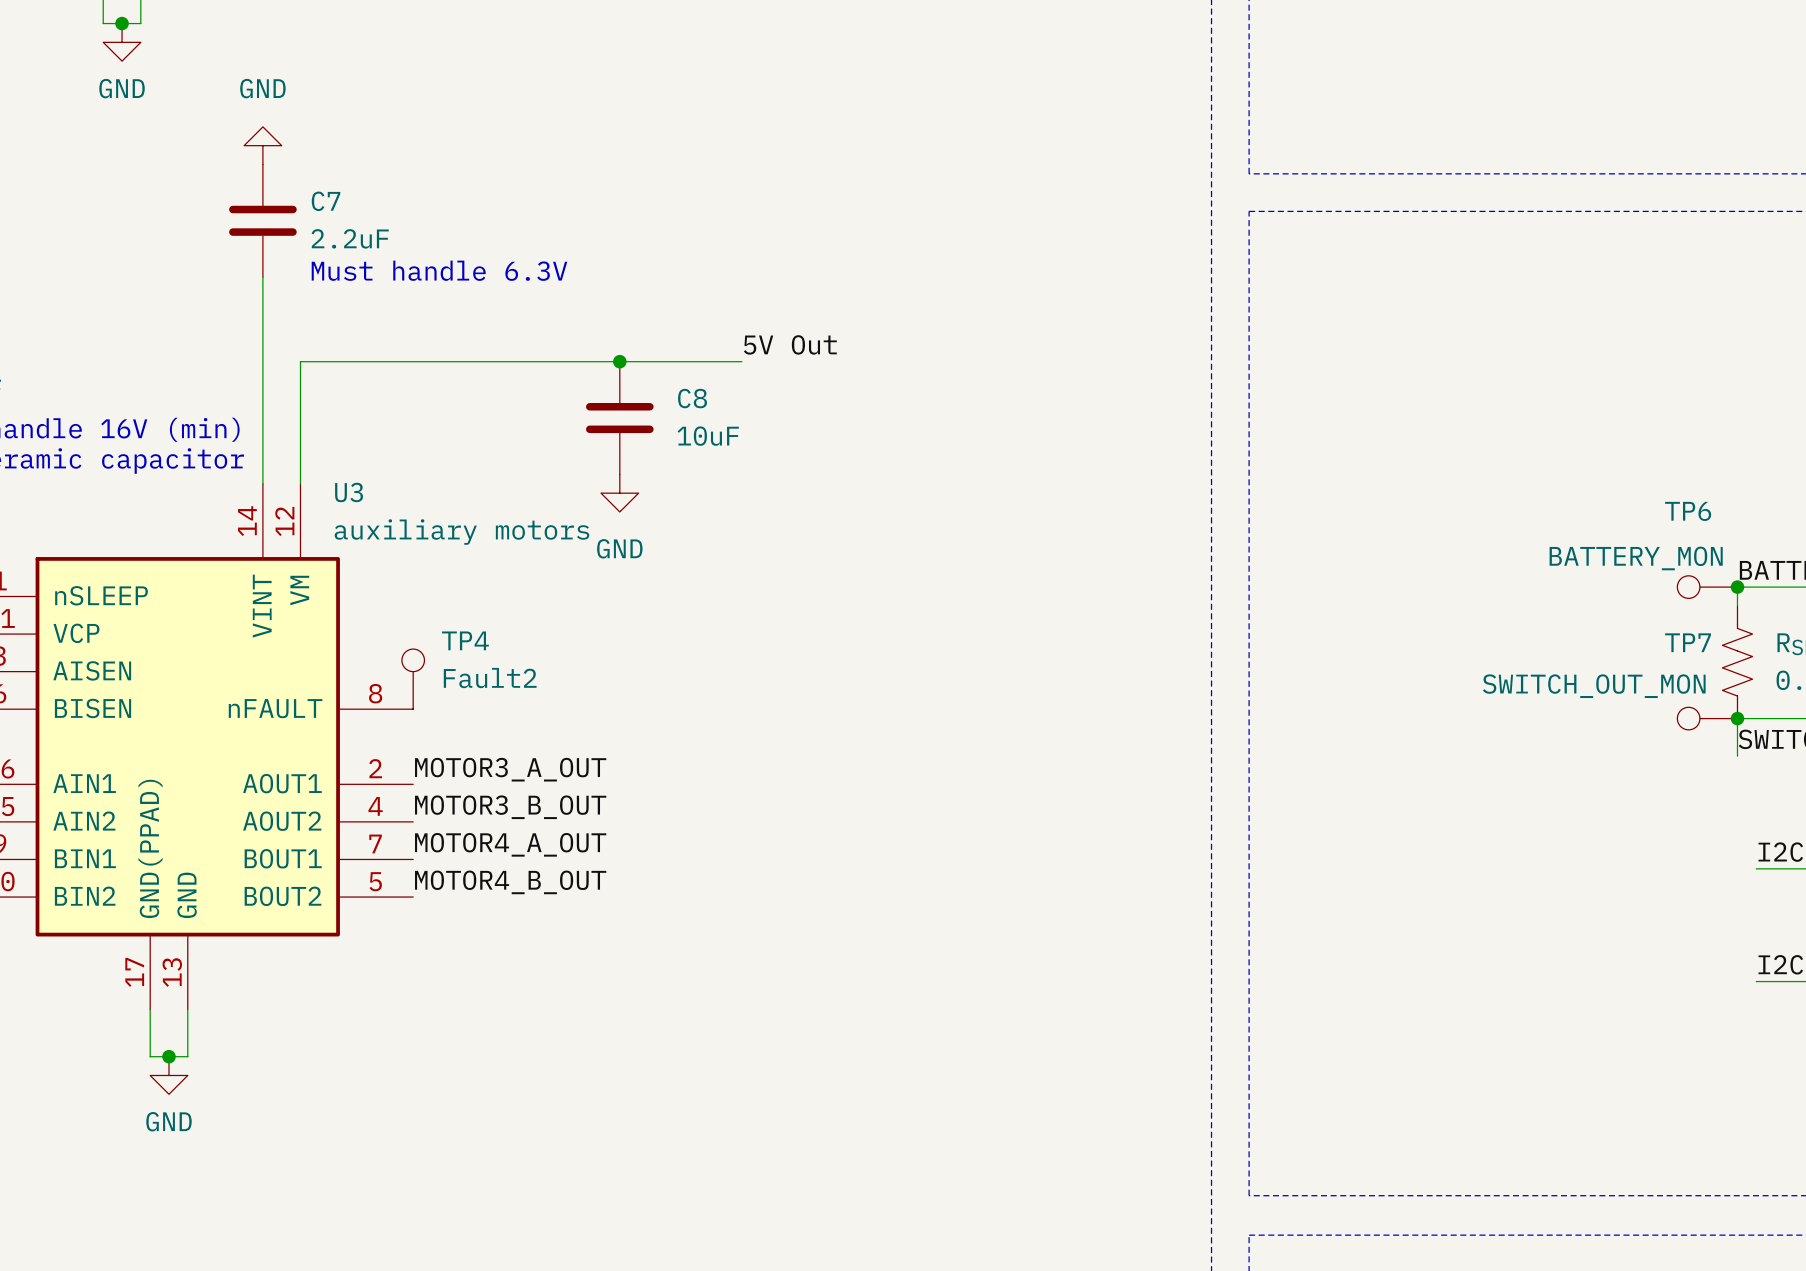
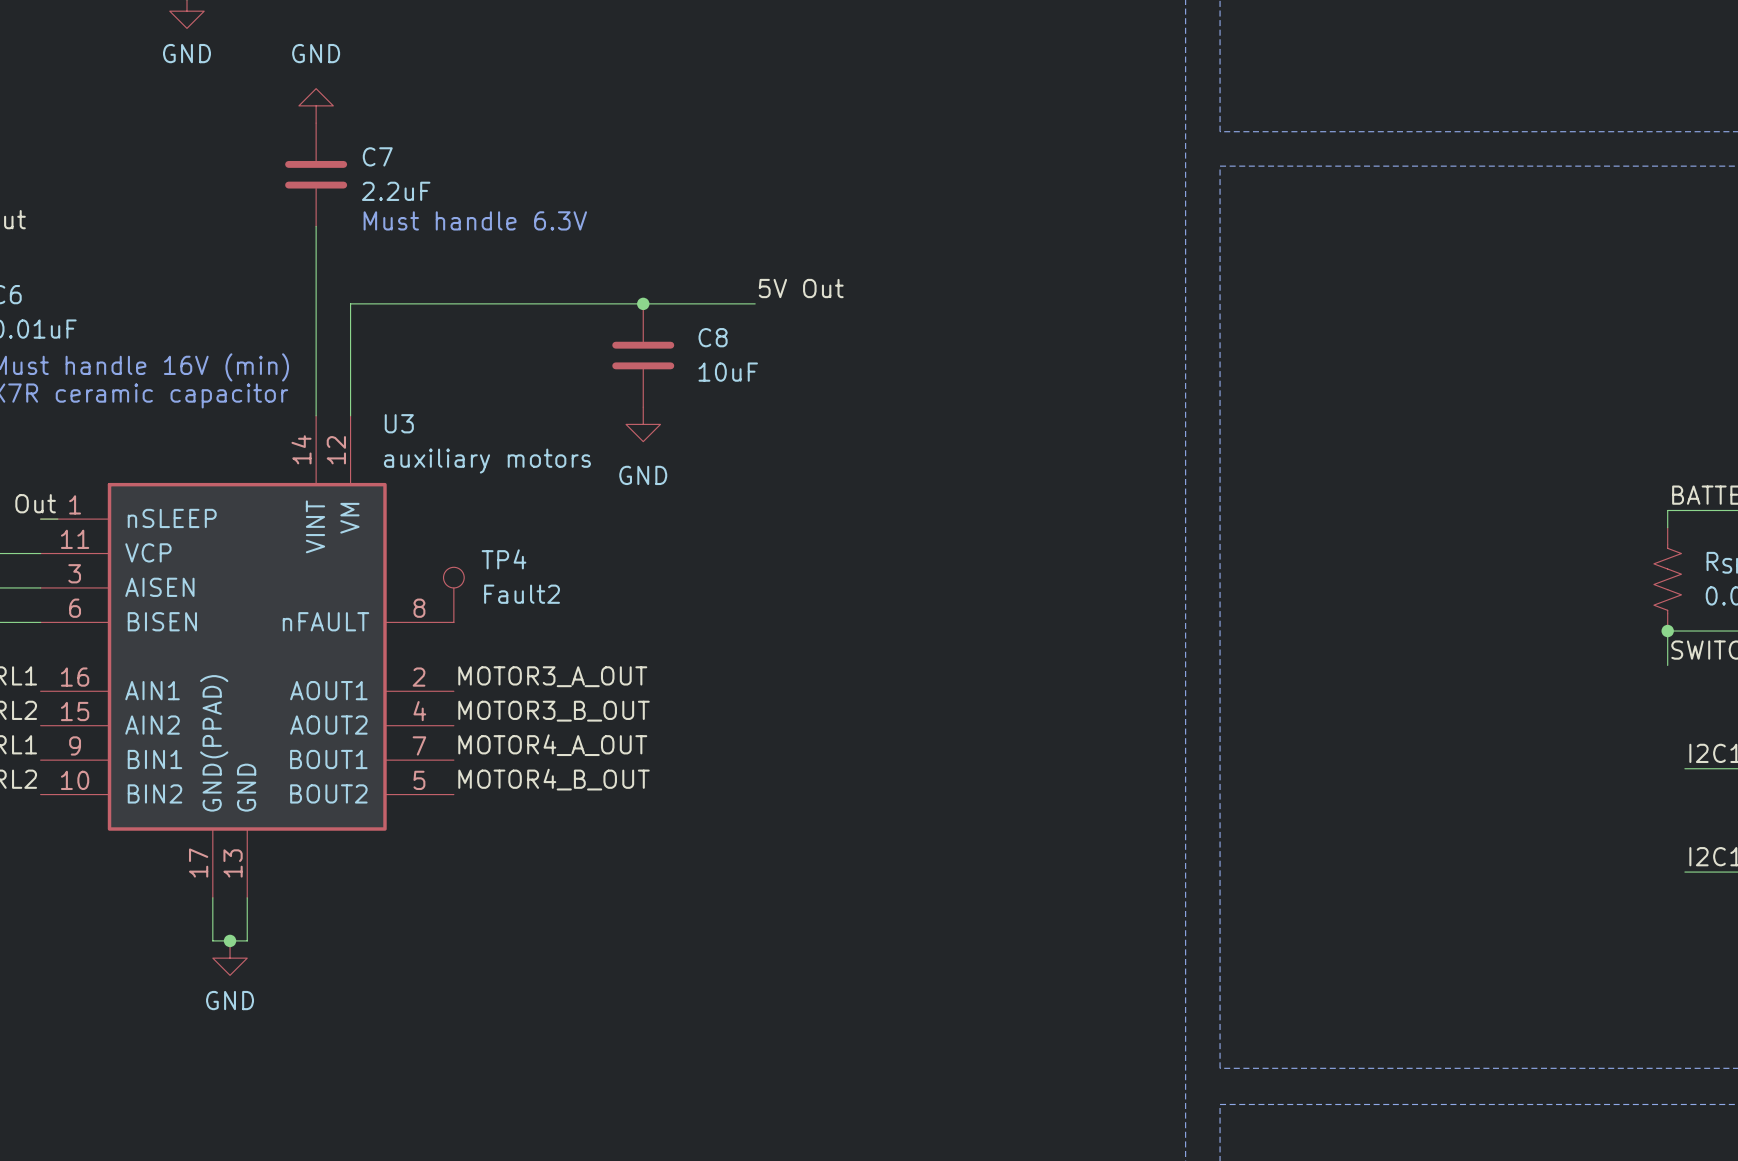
TP6: BATTERY_MON (1707, 587) -> none
junction: (1737, 587) -> none
TP7: SWITCH_OUT_MON (1707, 718) -> none

